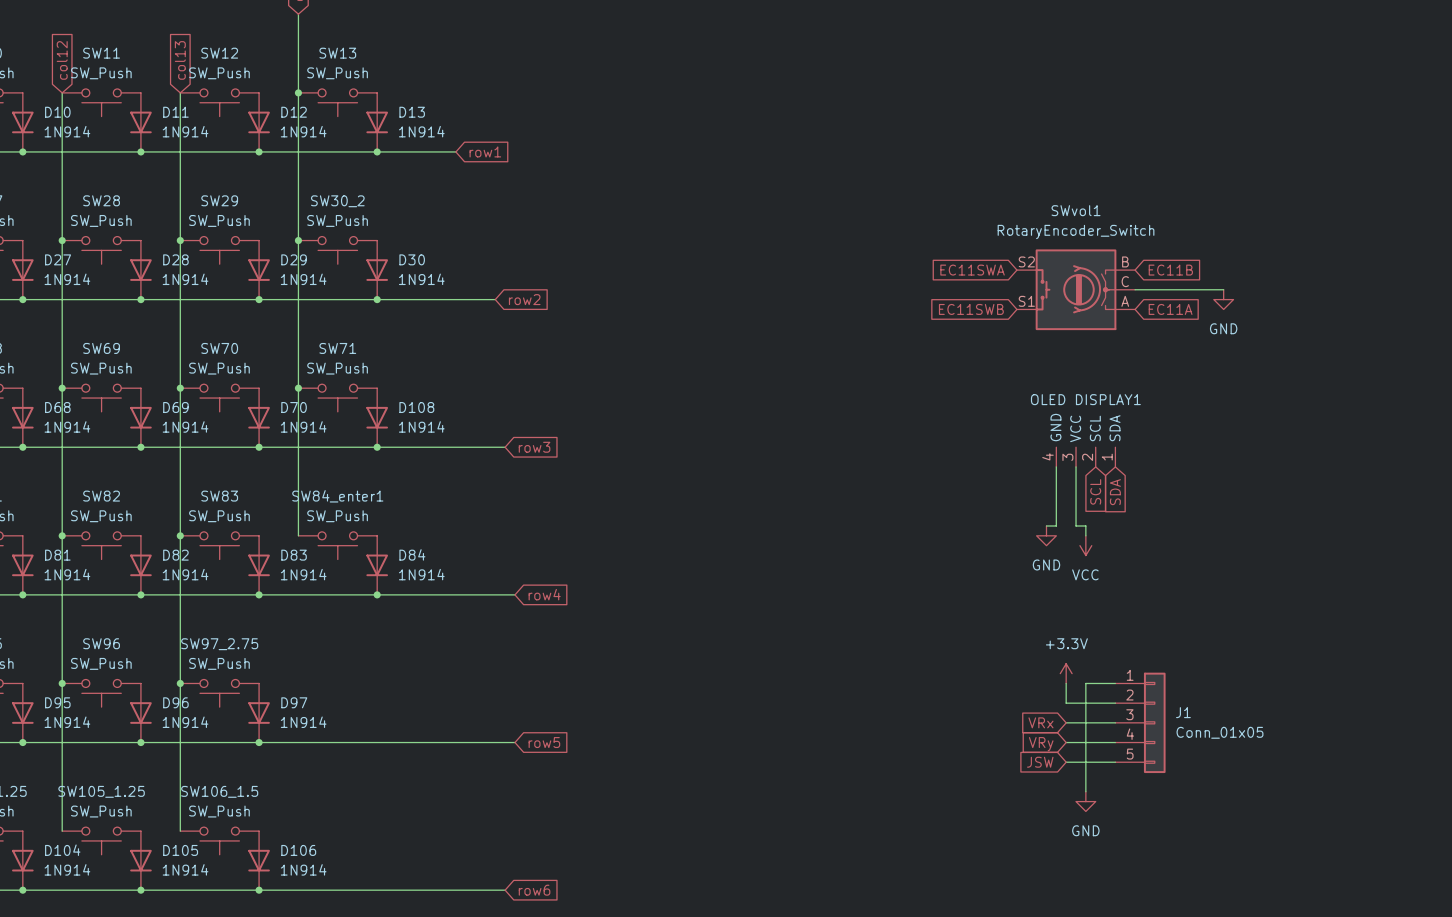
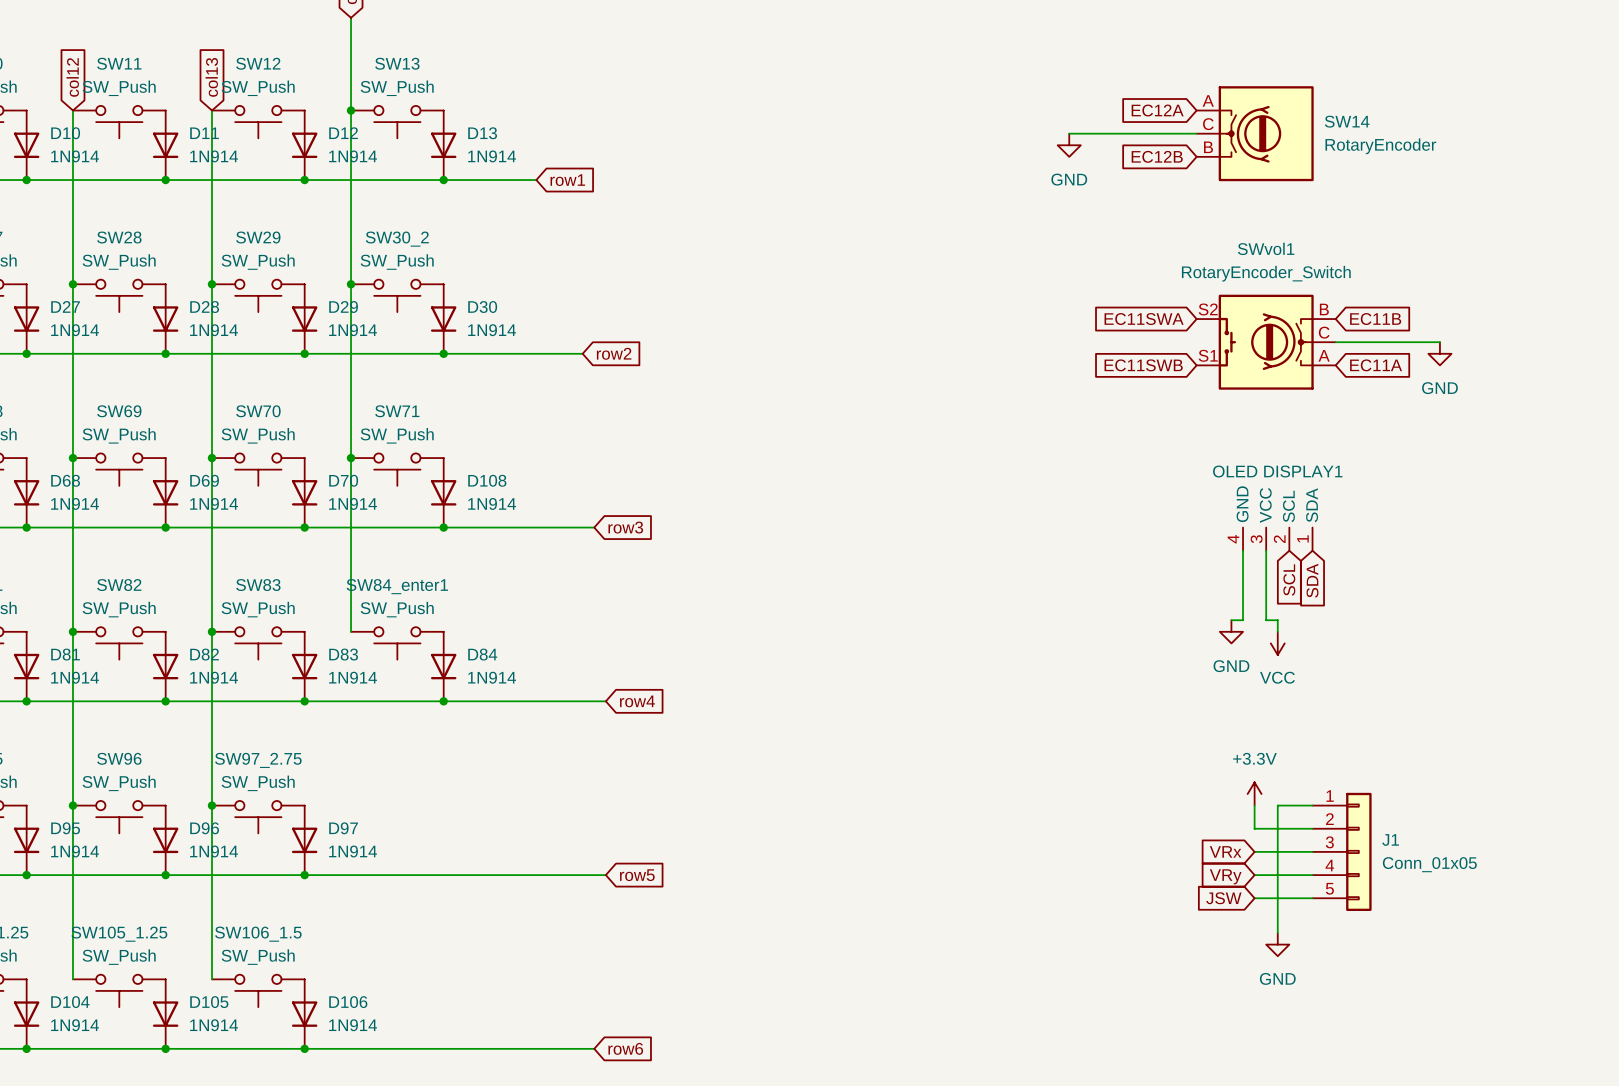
global label: none -> EC12A (1157, 110)
wire: none -> (1069, 133) (1196, 133)
SW14: none -> RotaryEncoder (1255, 133)
power symbol: none -> GND (1069, 145)
global label: none -> EC12B (1157, 156)

